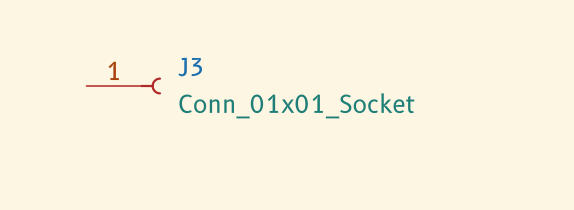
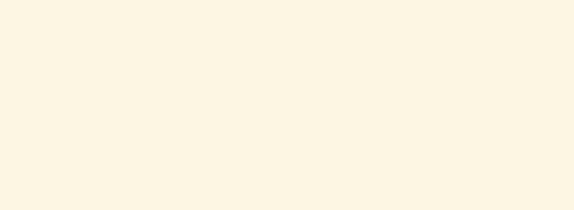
J3: Conn_01x01_Socket (123, 86) -> none

